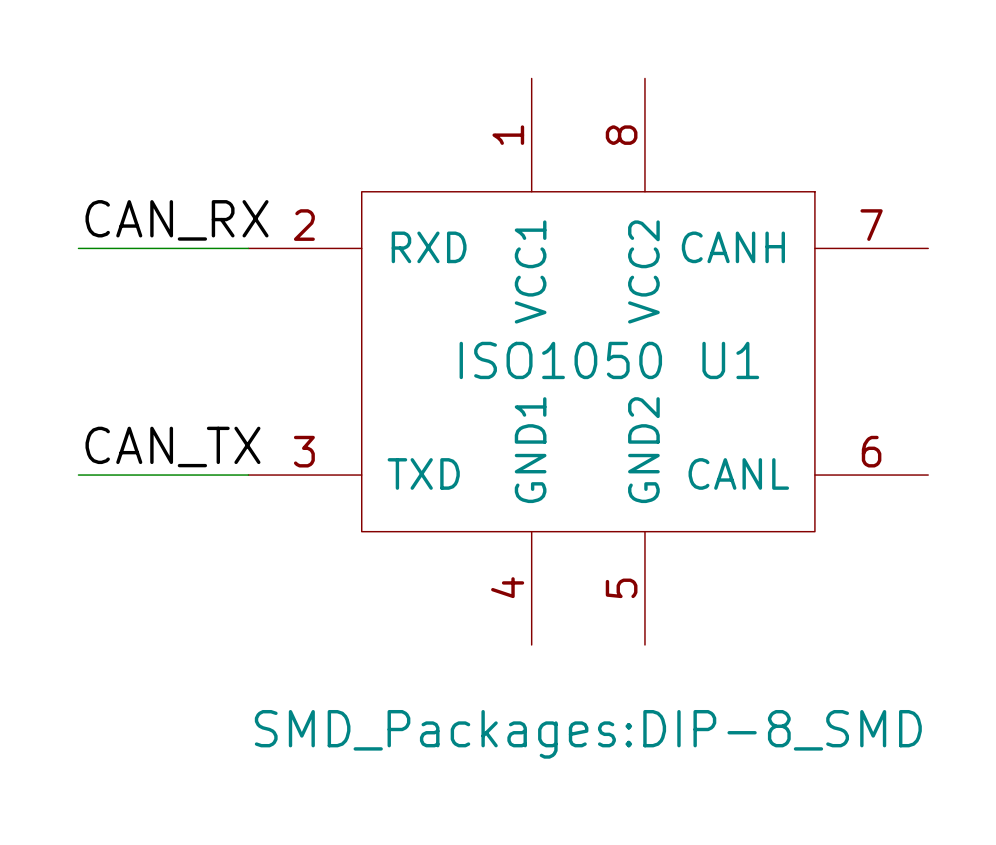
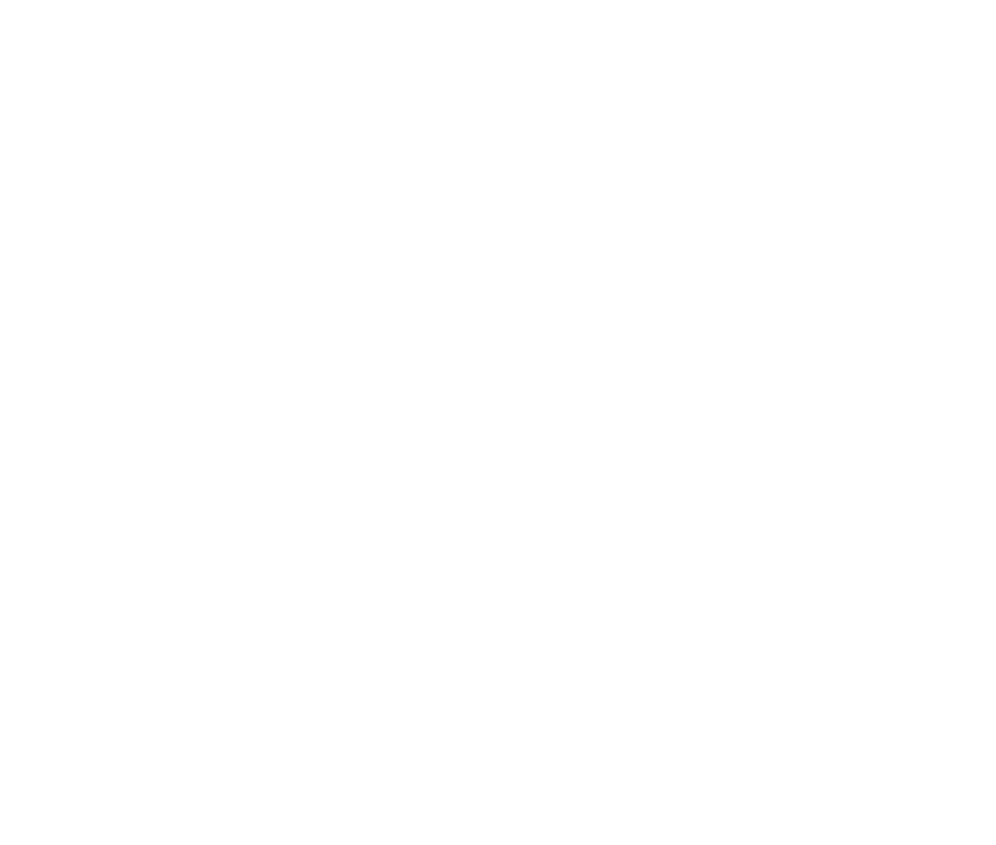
label: CAN_RX (177, 220) -> none
wire: (78, 248) (248, 248) -> none
U1: ISO1050 (588, 361) -> none
label: CAN_TX (172, 446) -> none
wire: (78, 475) (248, 475) -> none

